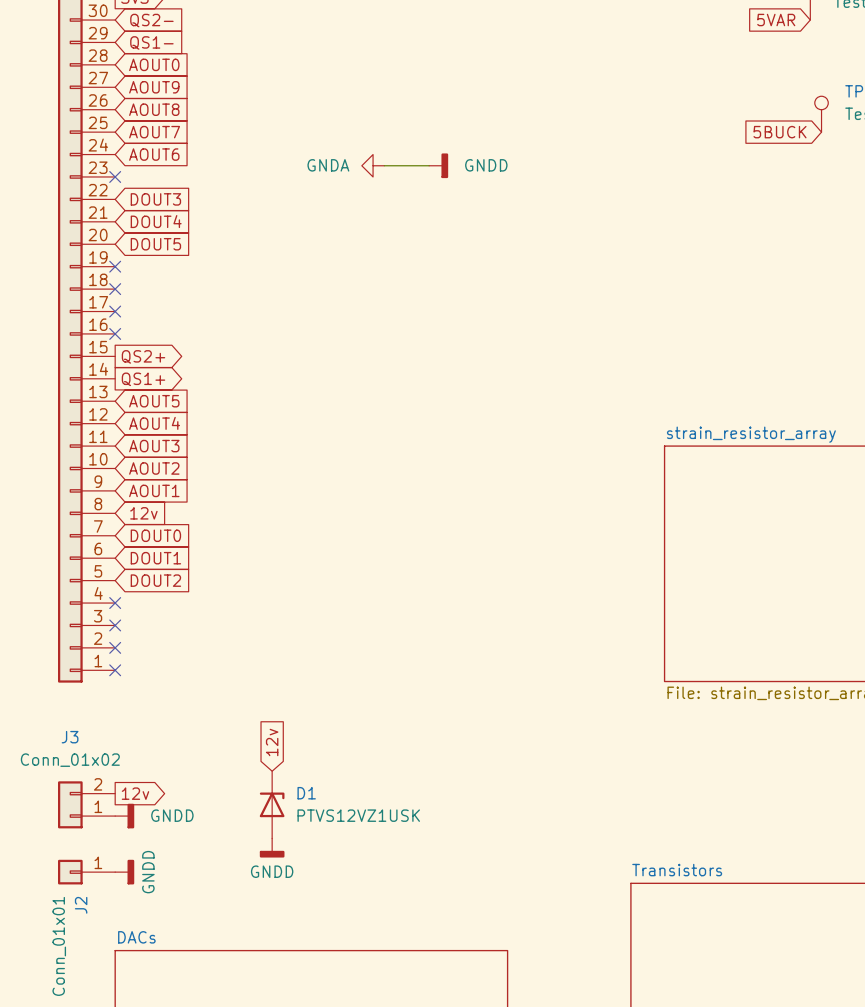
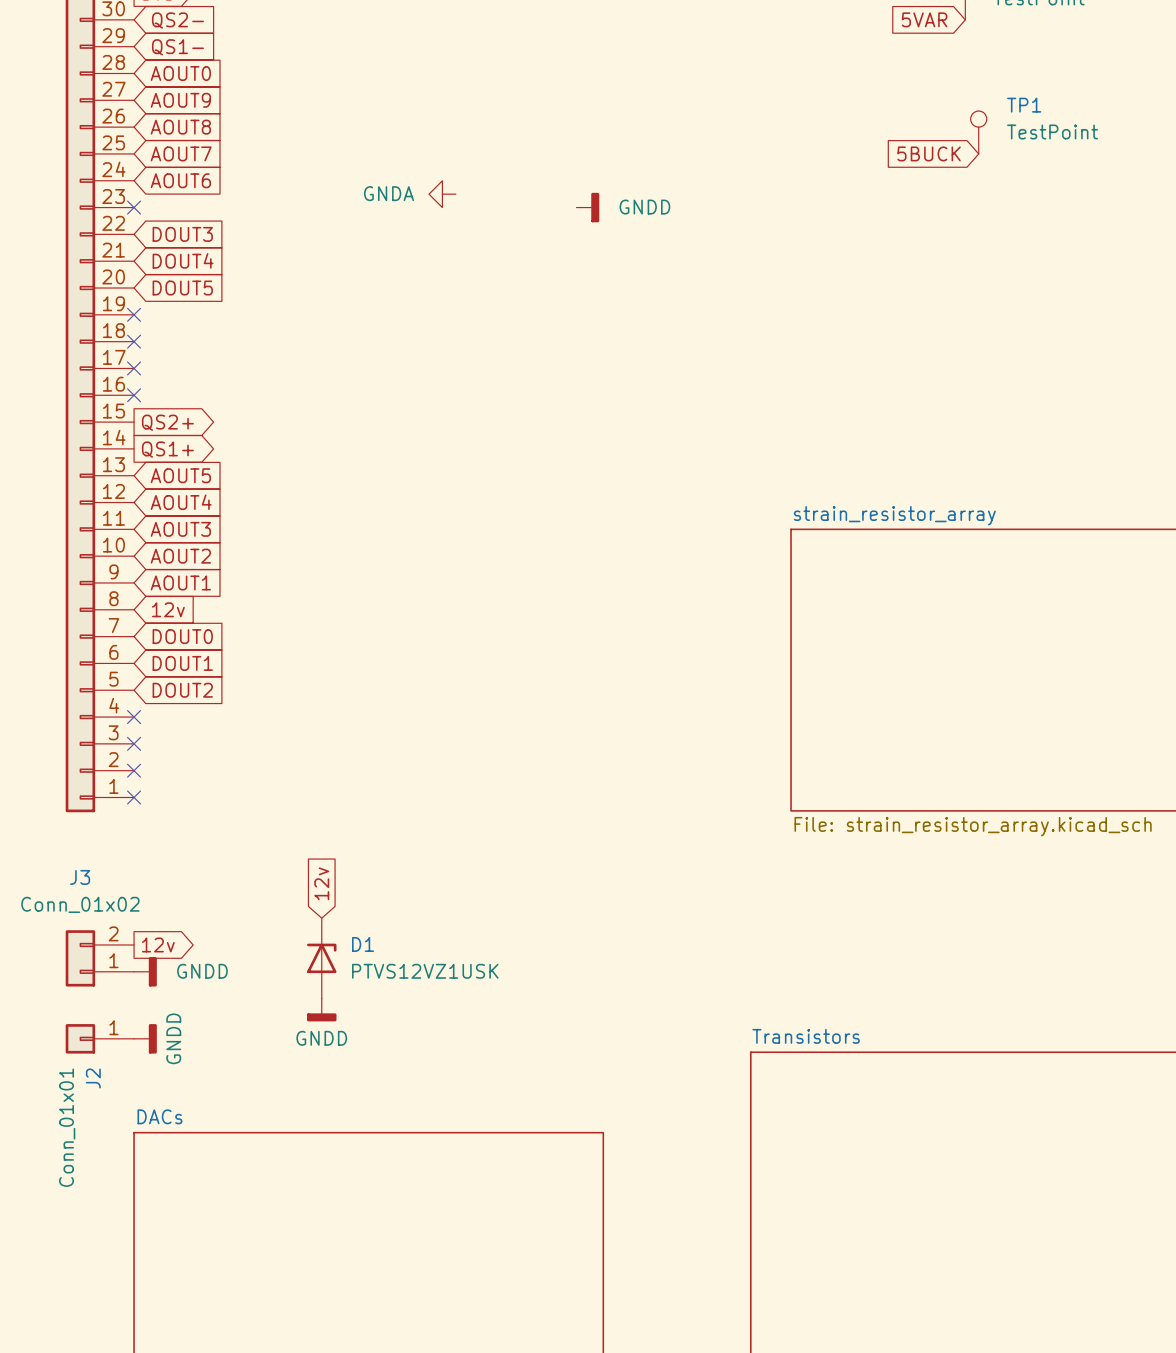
wire: (384, 165) (429, 165) -> none
power symbol position: GNDD (438, 165) -> GNDD (587, 207)

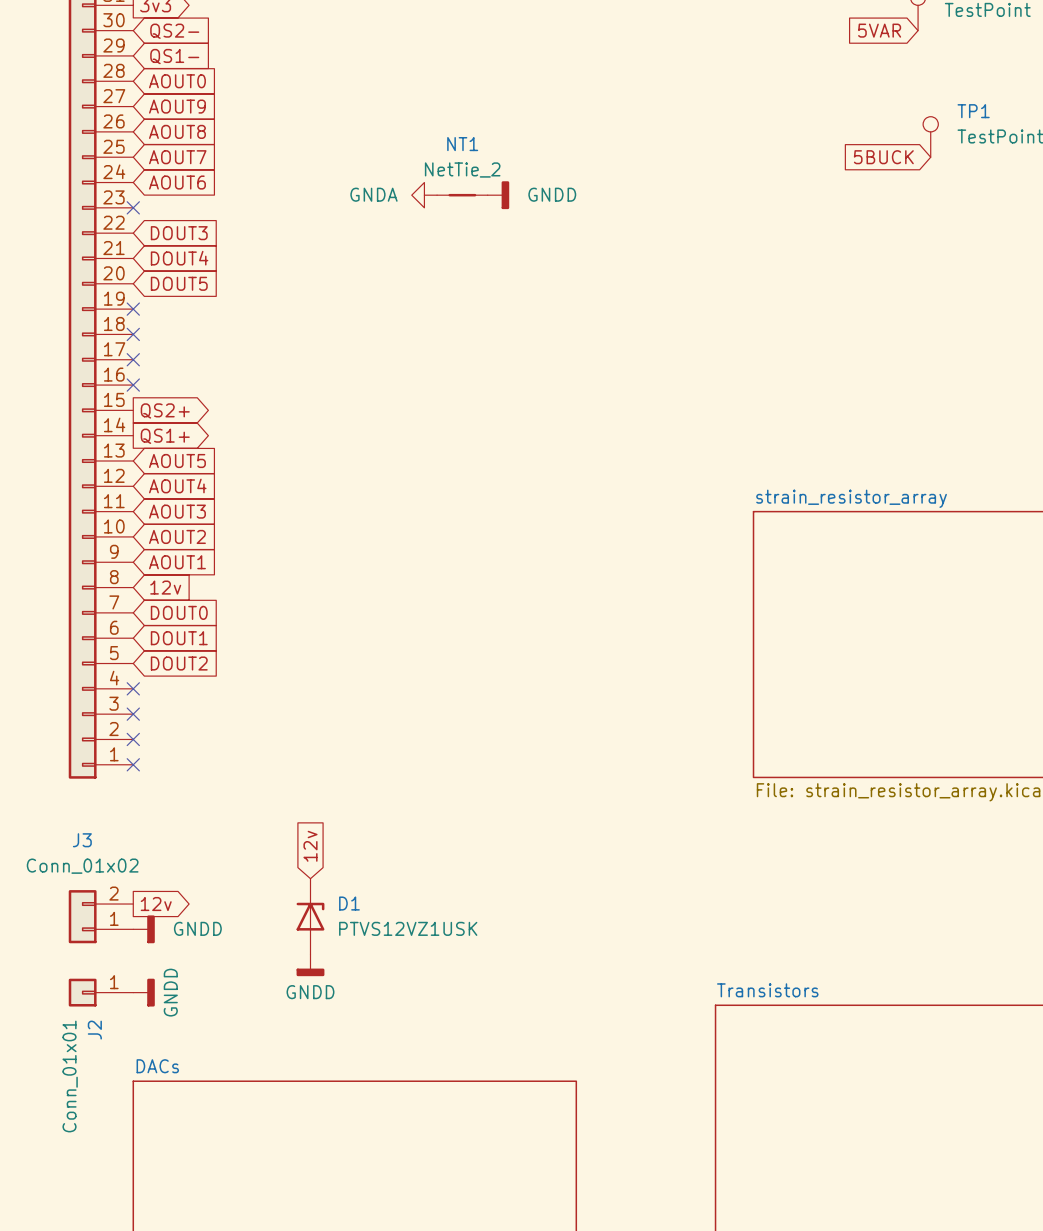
NT1: none -> NetTie_2 (462, 195)
power symbol position: GNDD (587, 207) -> GNDD (498, 195)

